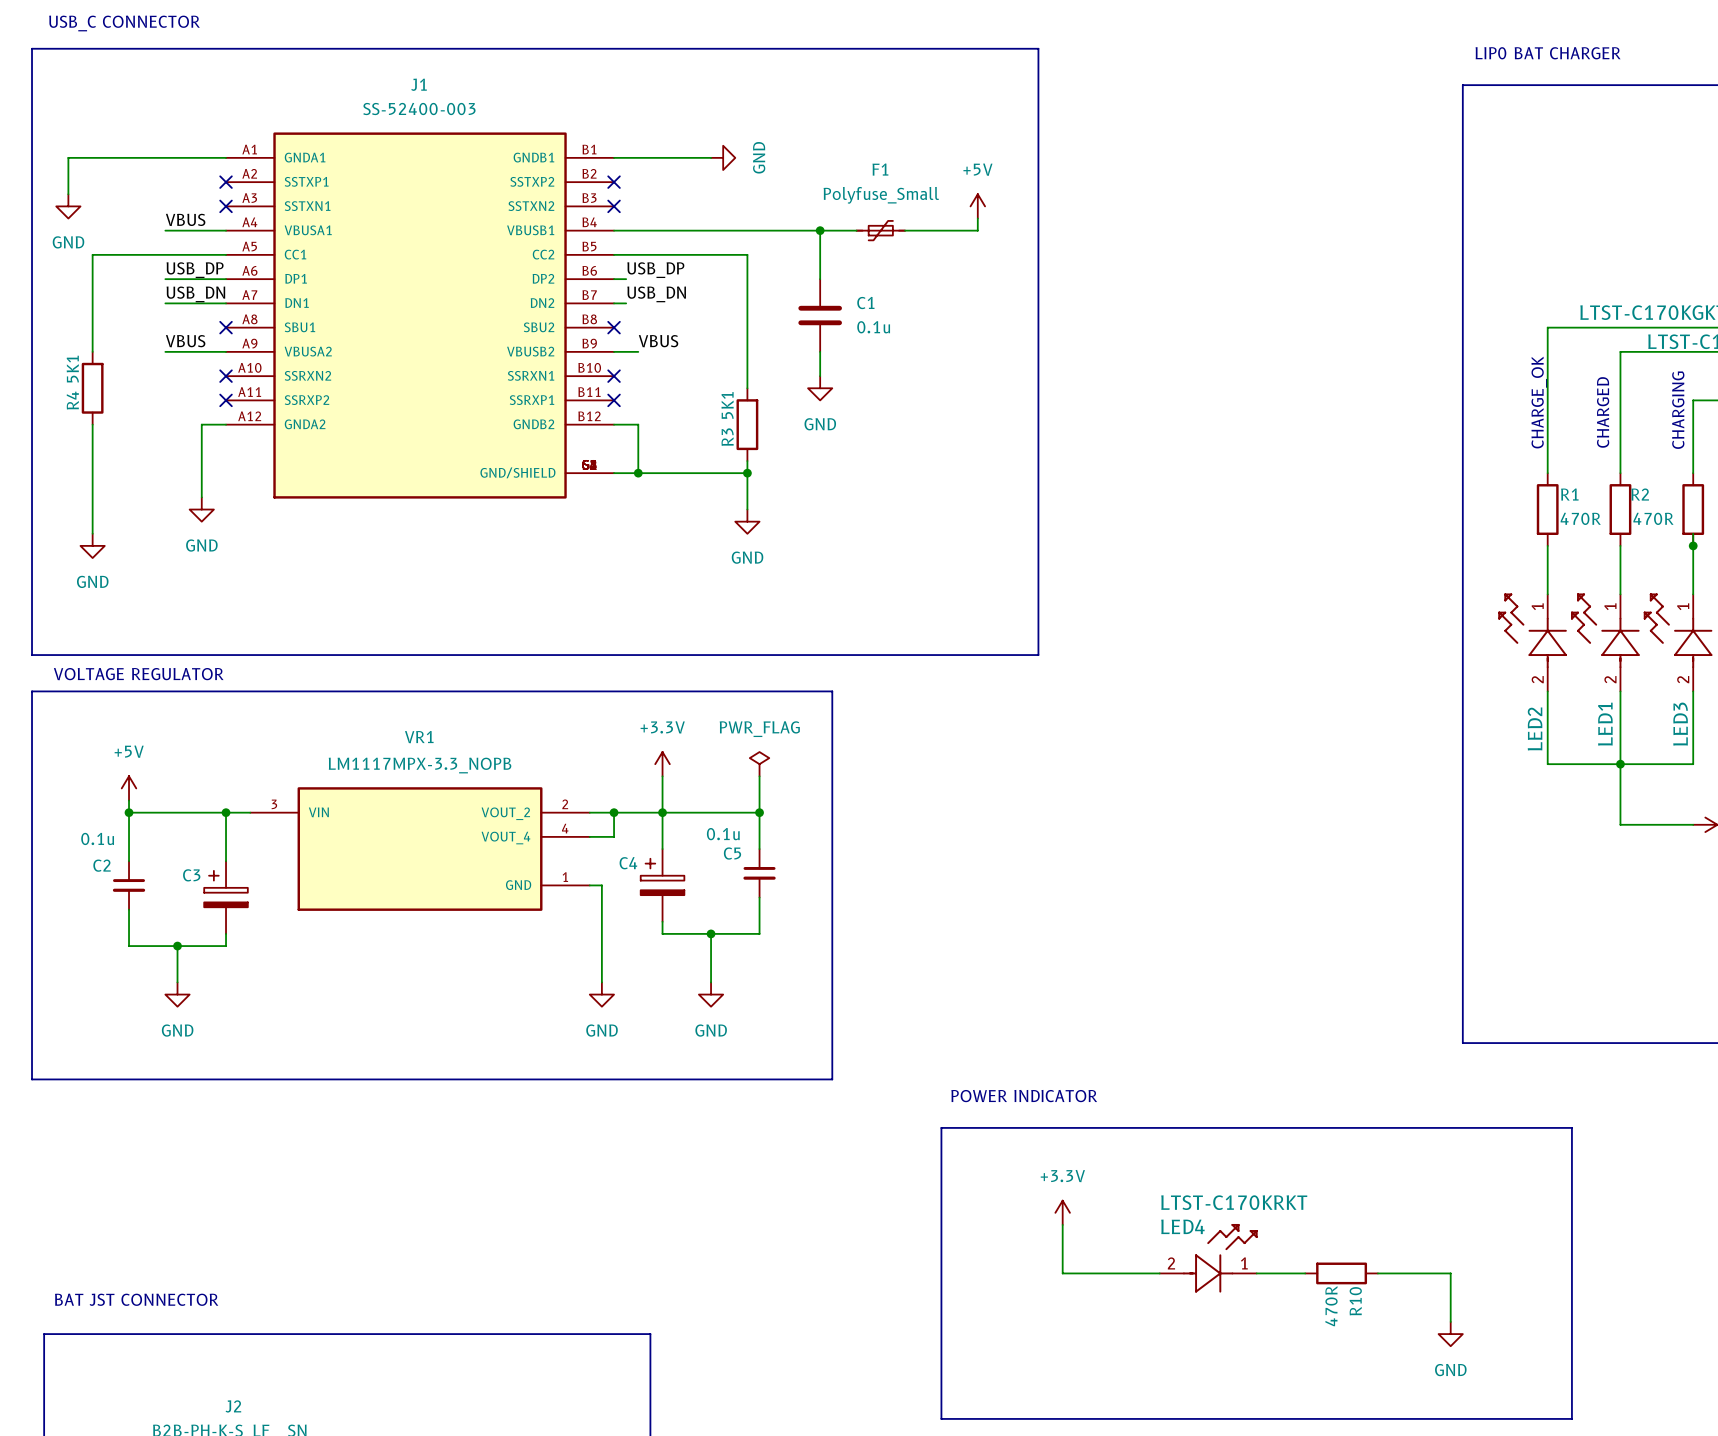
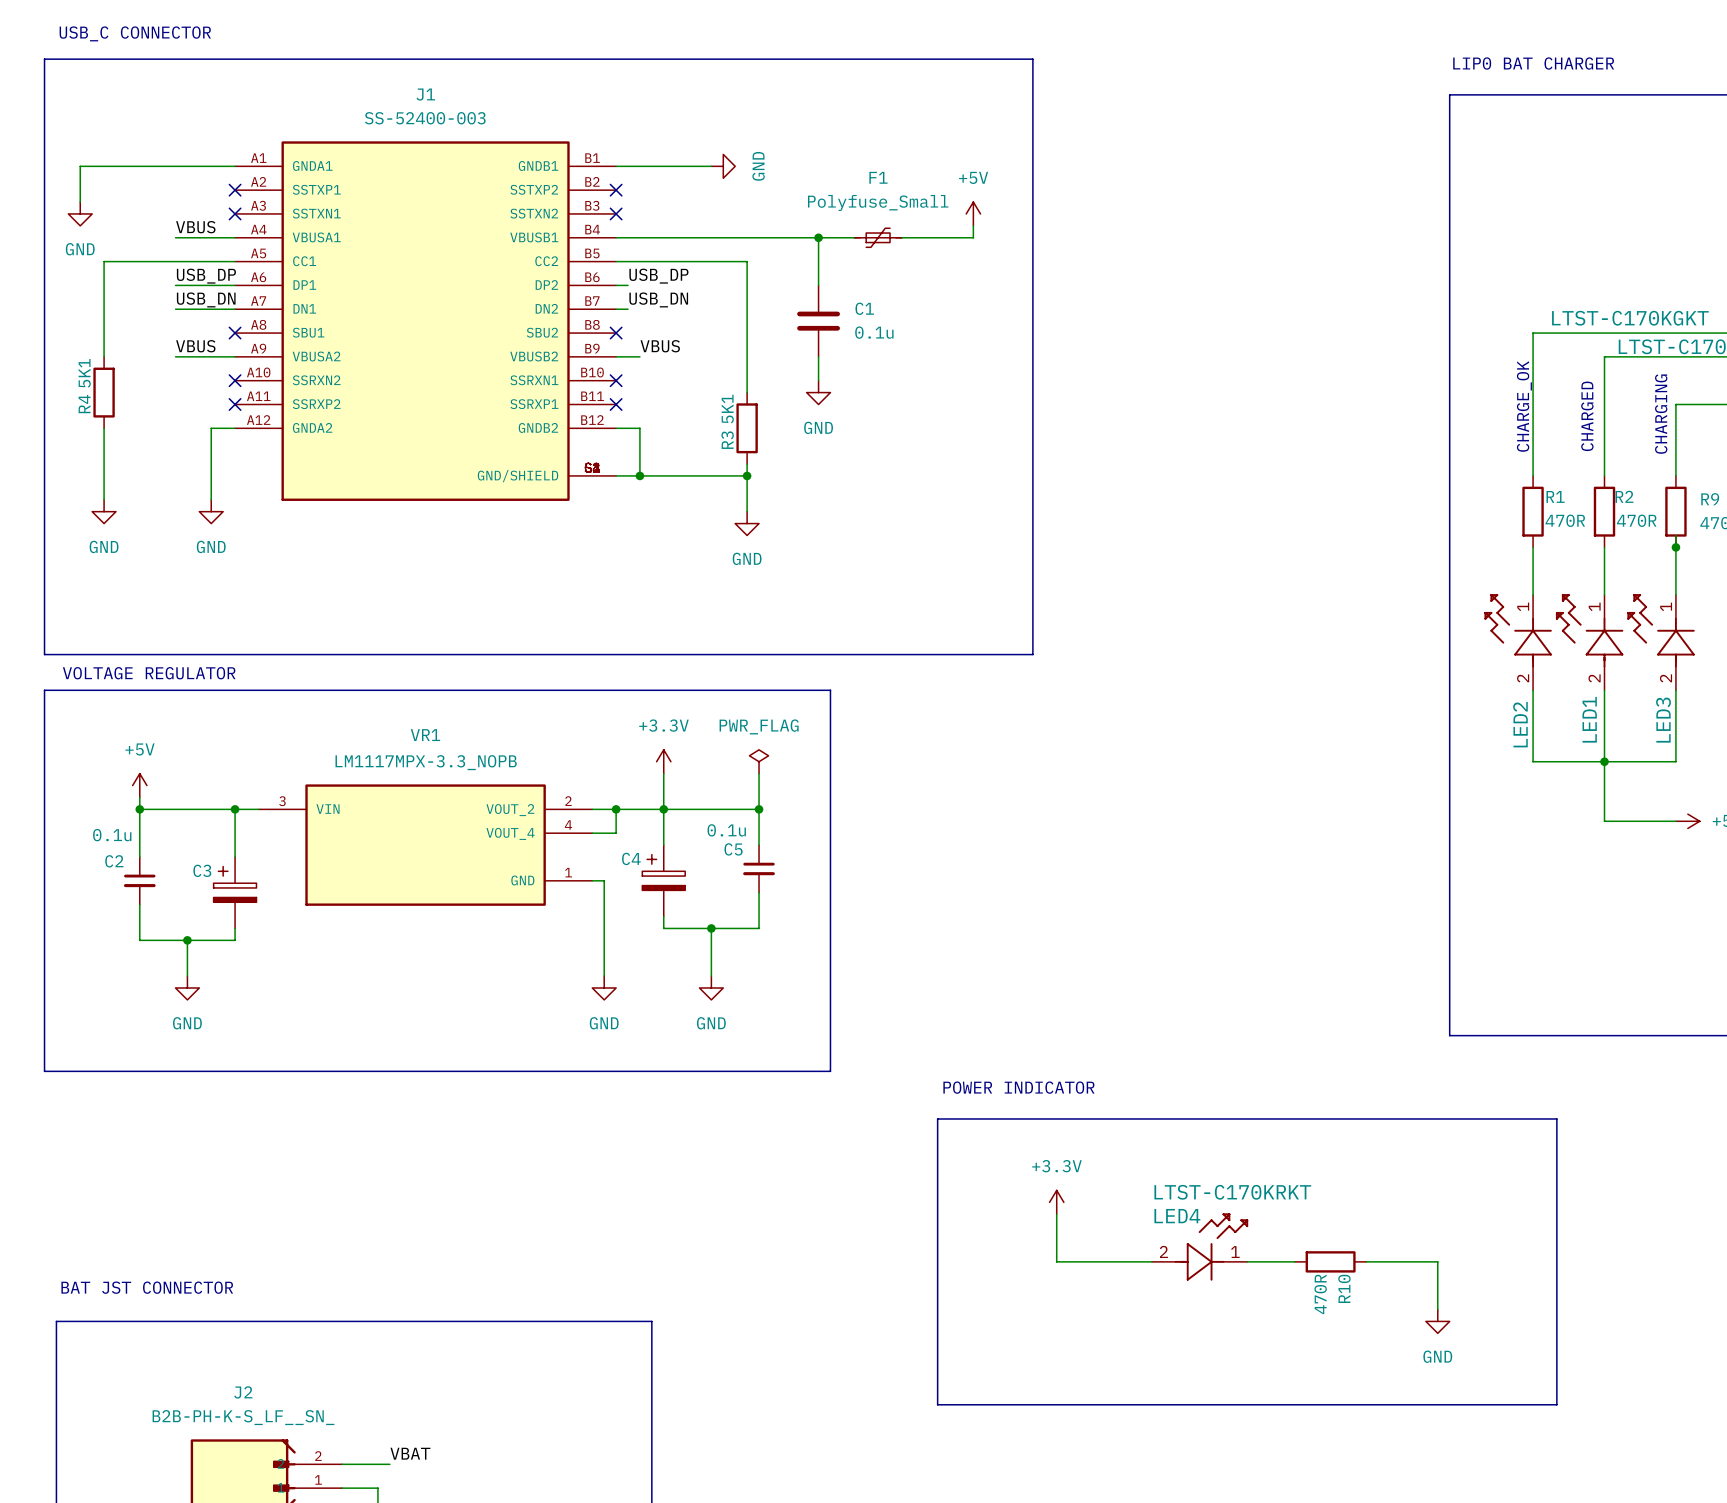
wire: (92, 497) (92, 533) -> none
power symbol position: GND (92, 545) -> GND (104, 511)

